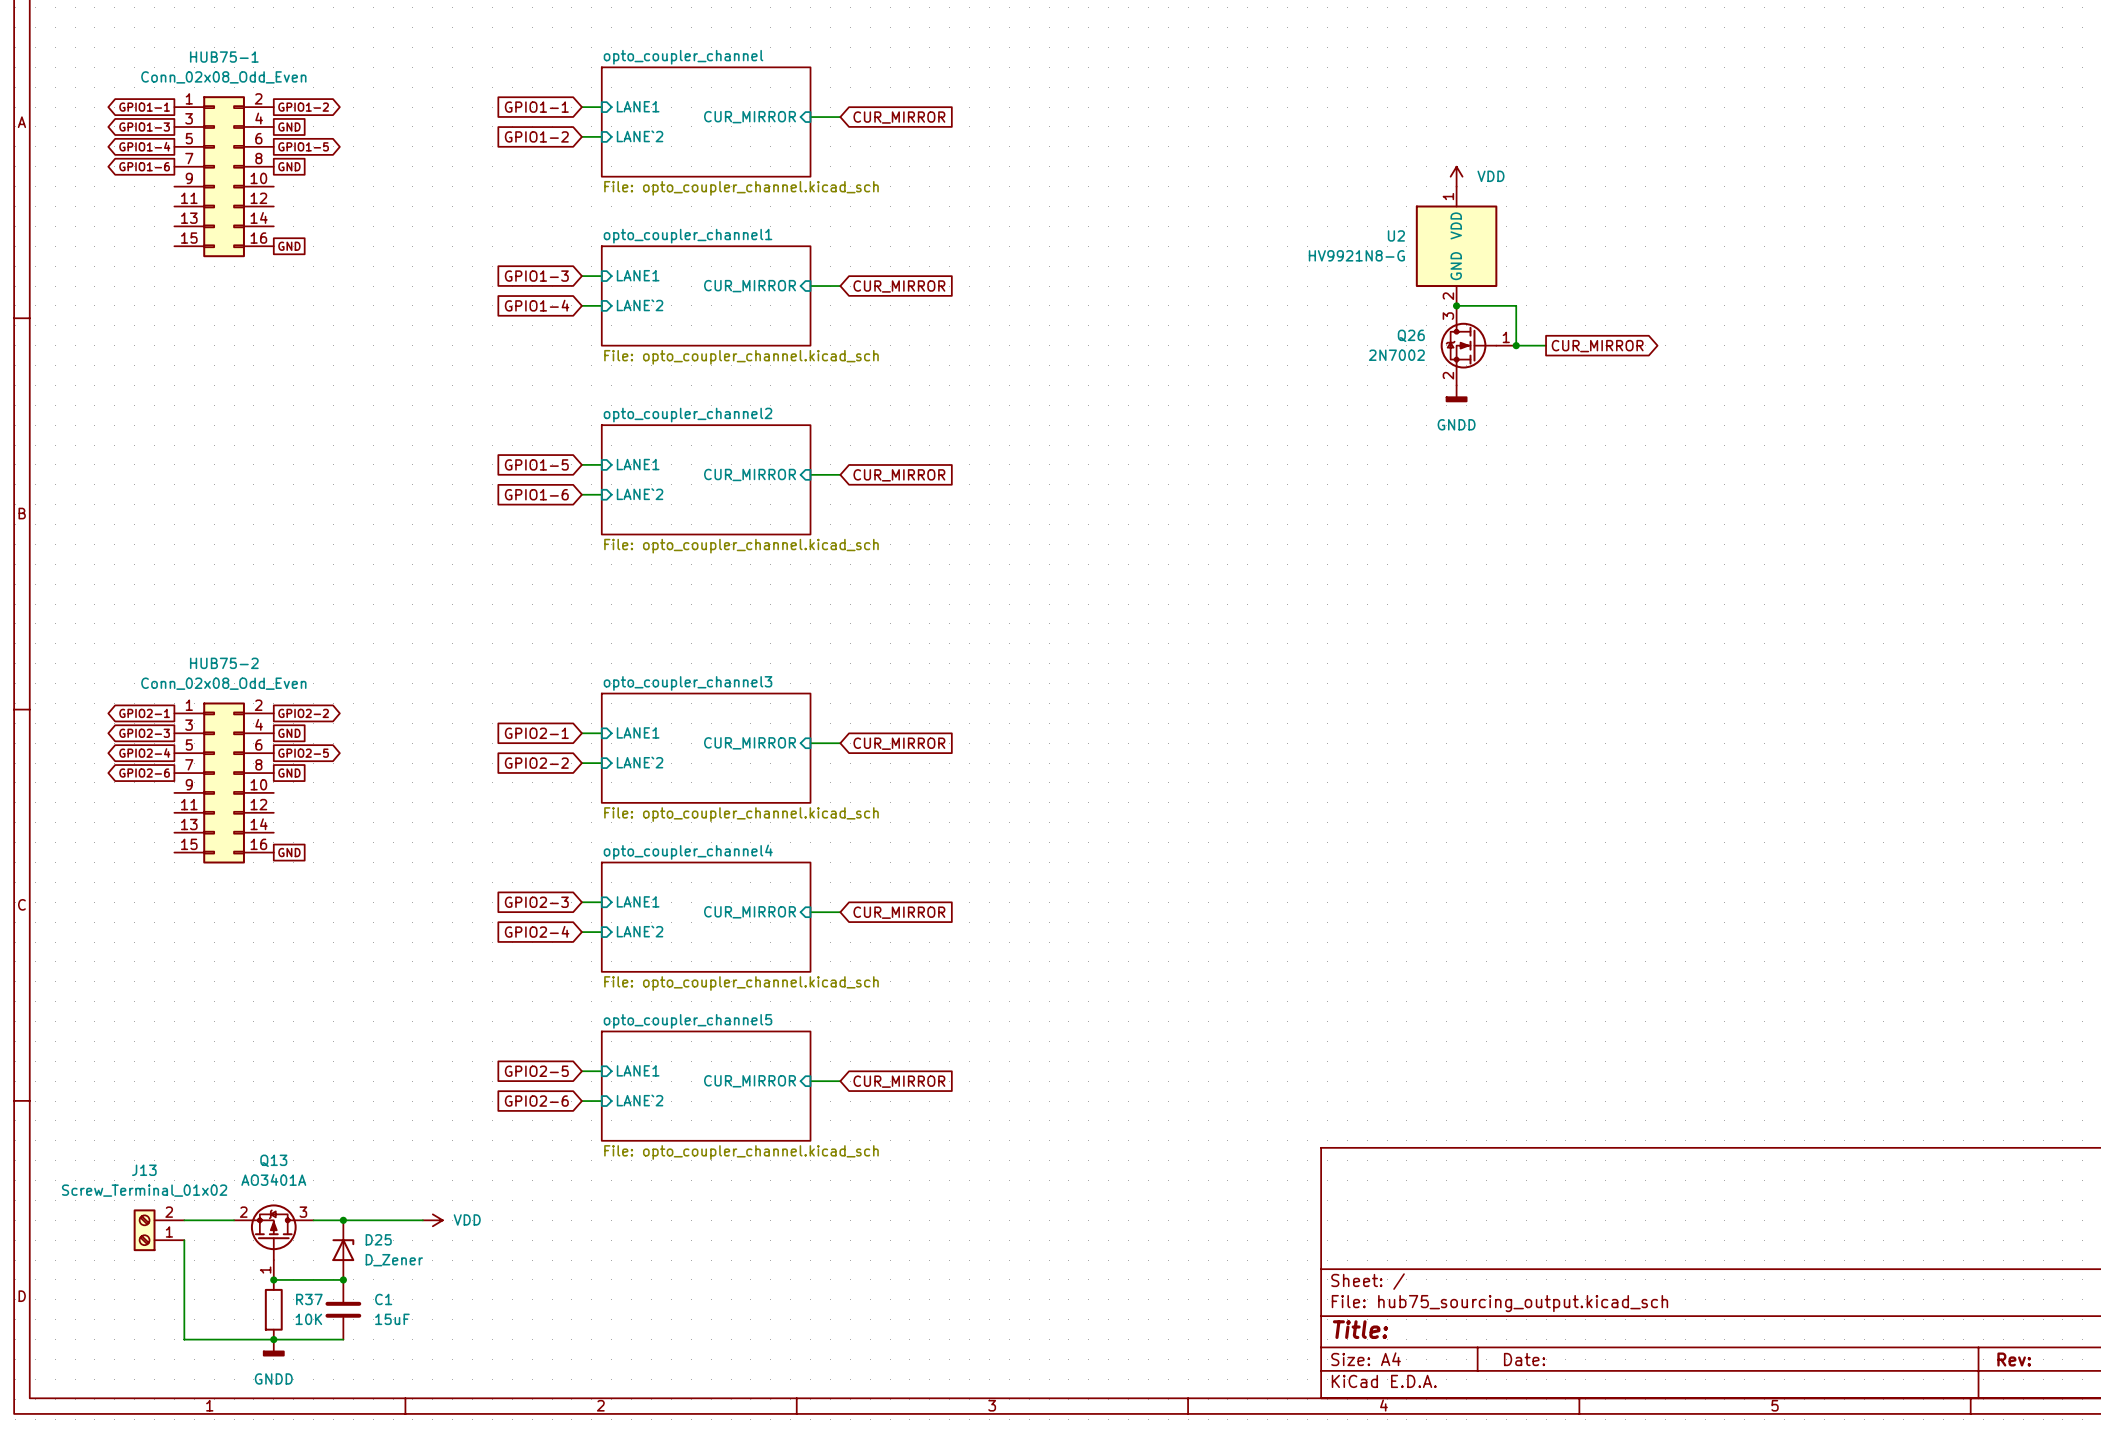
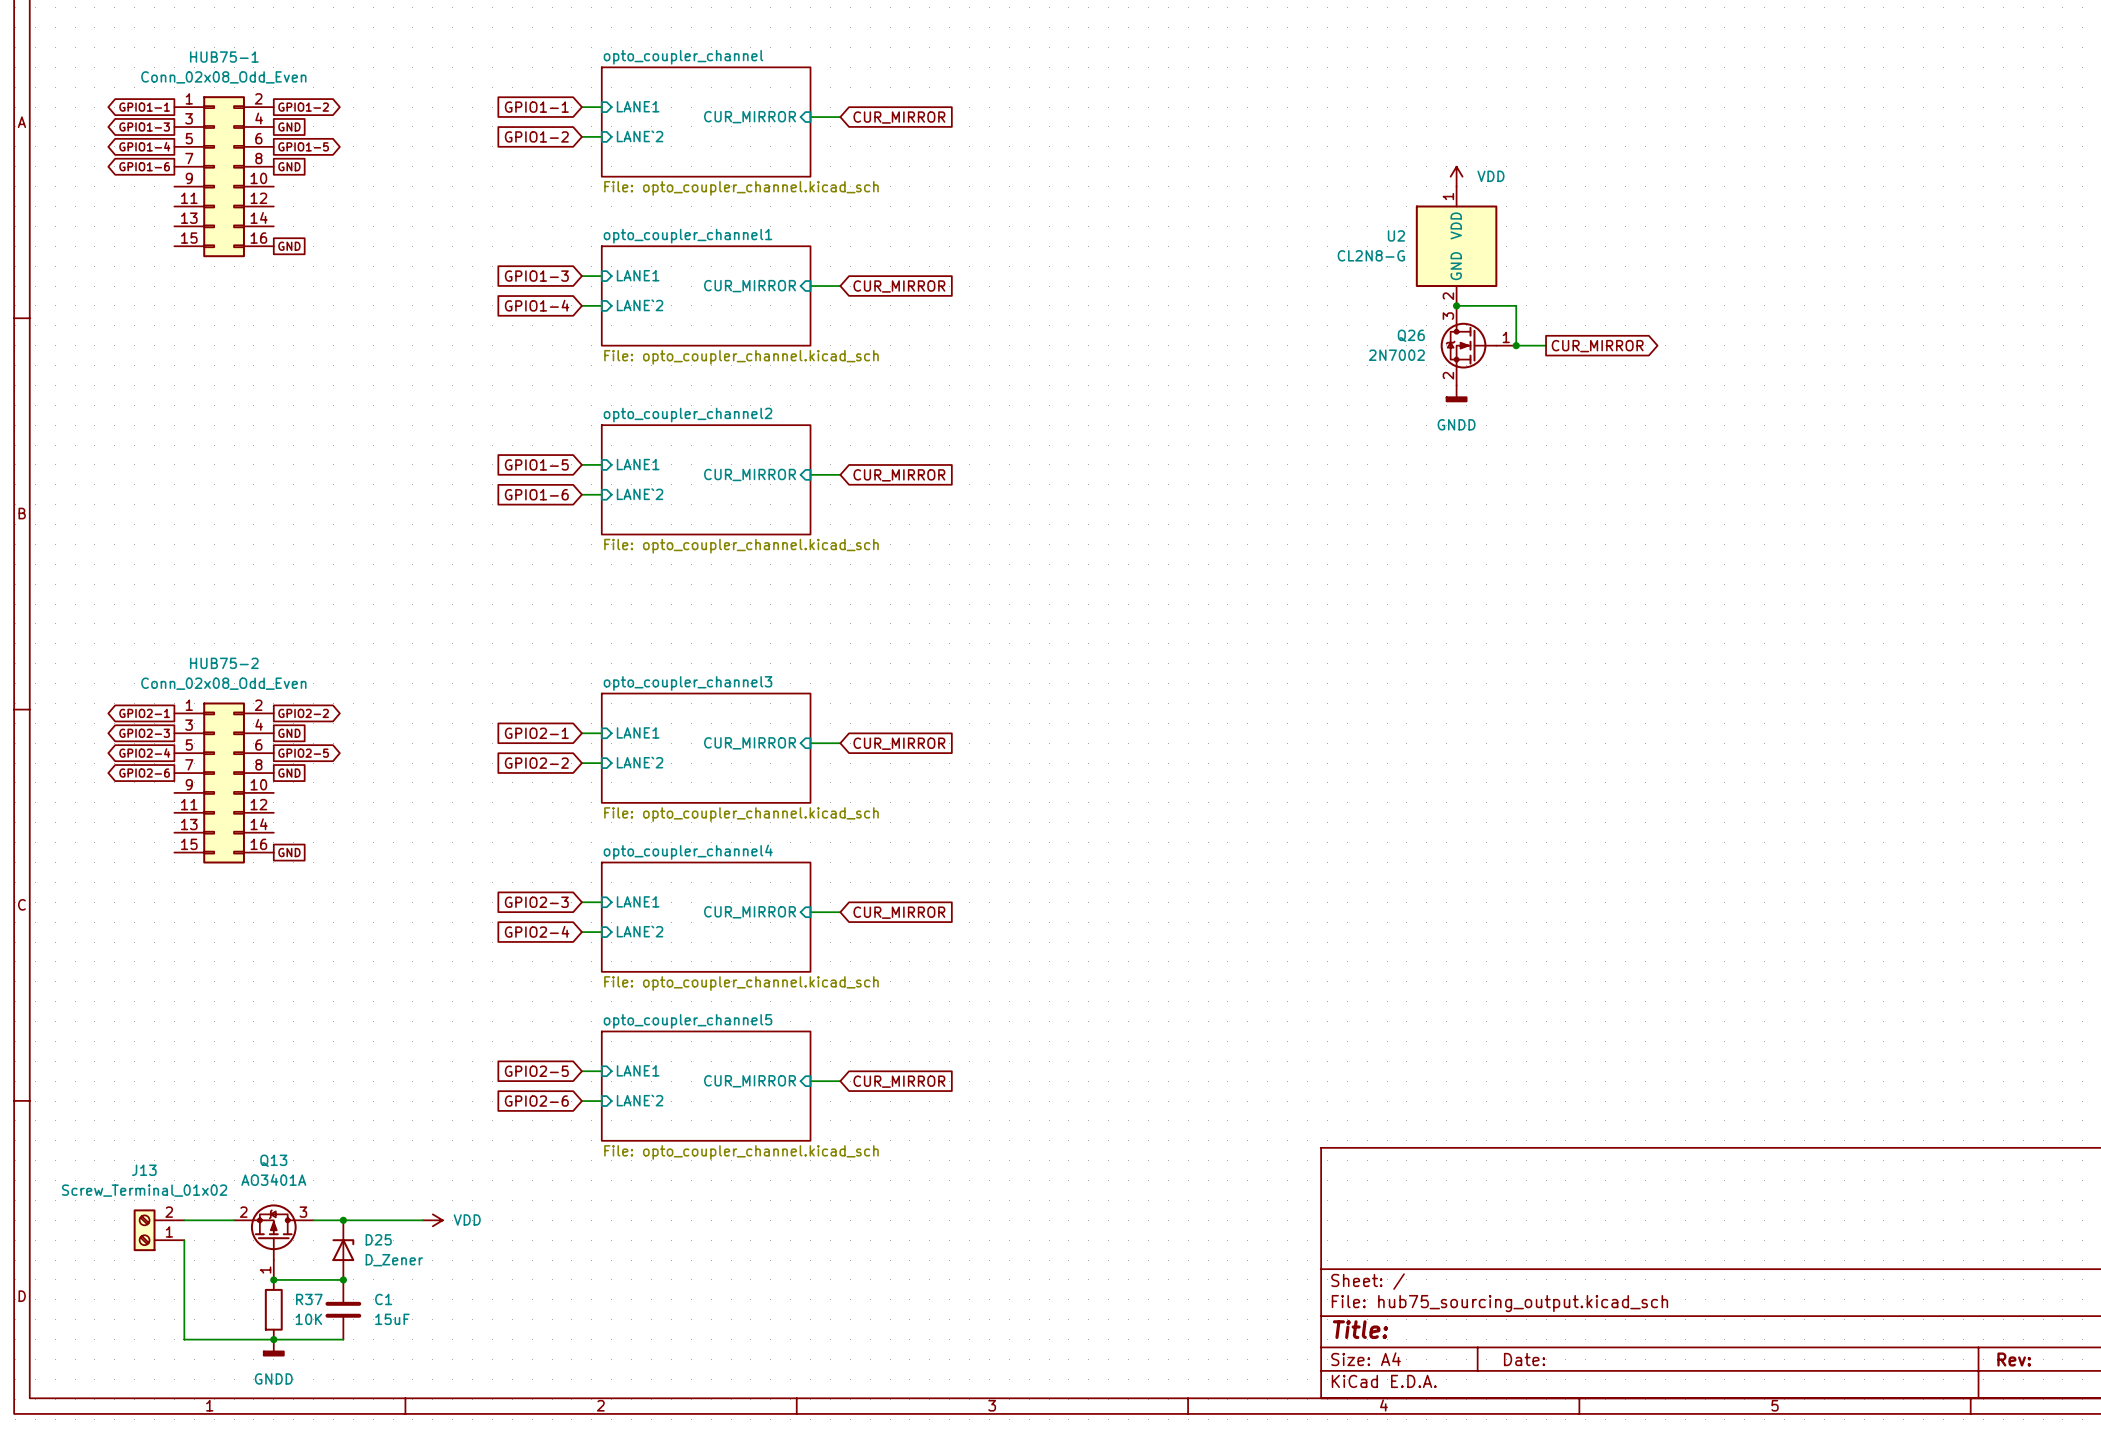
U2 value: HV9921N8-G (1356, 255) -> CL2N8-G (1371, 255)

